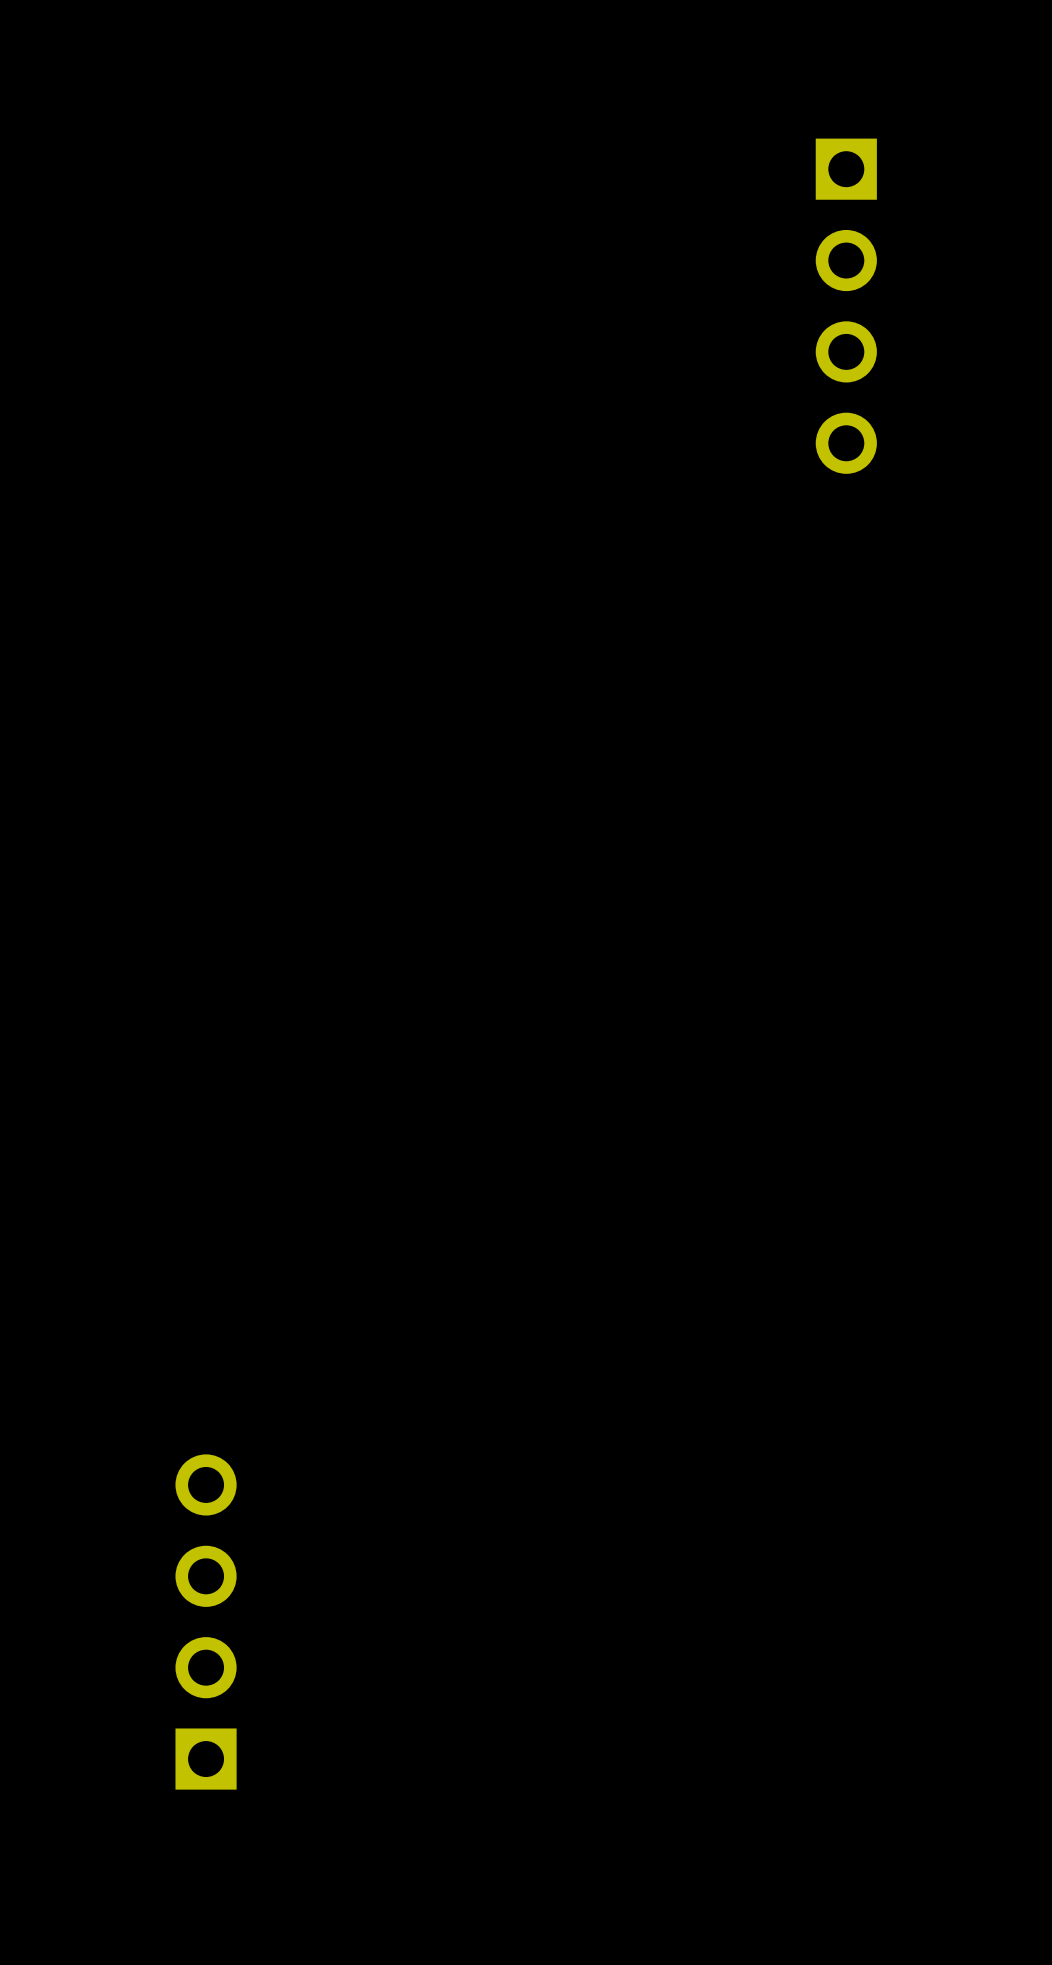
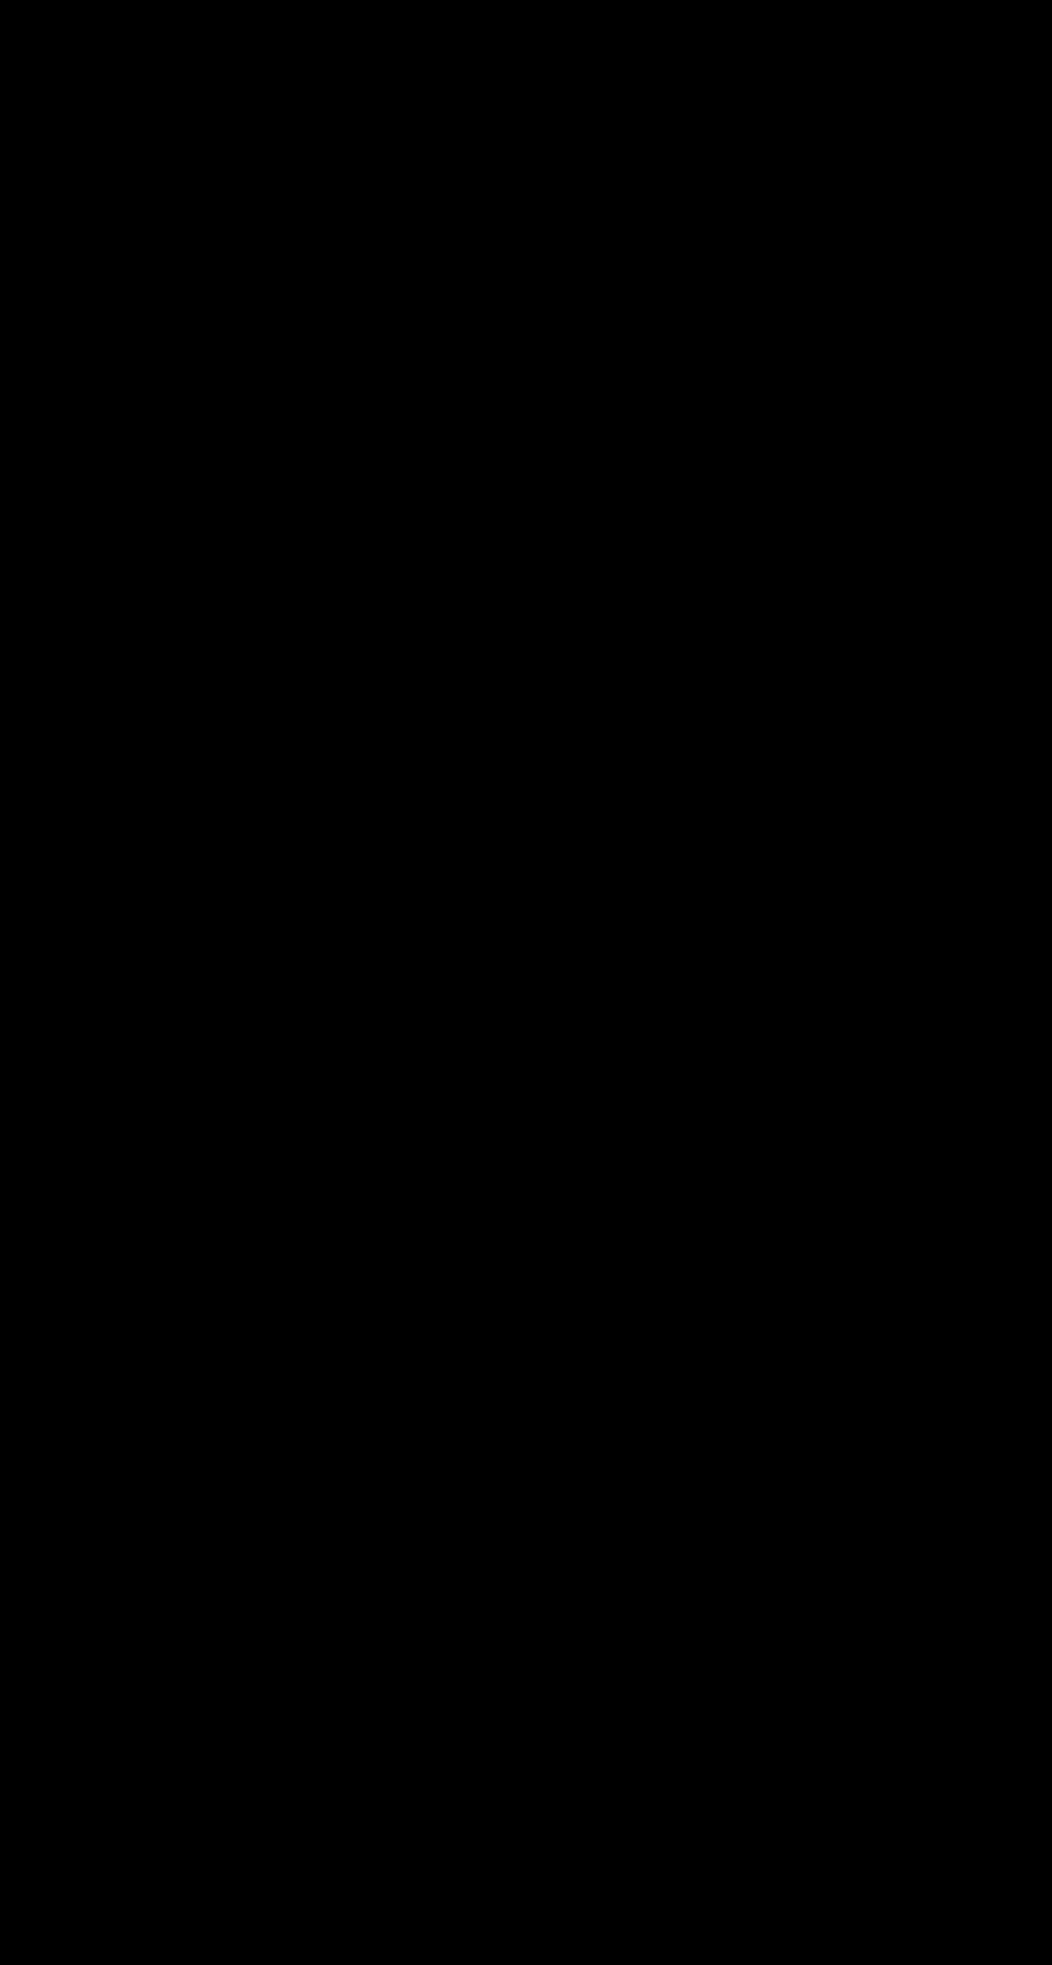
part: (846, 306) -> none
part: (206, 1622) -> none

